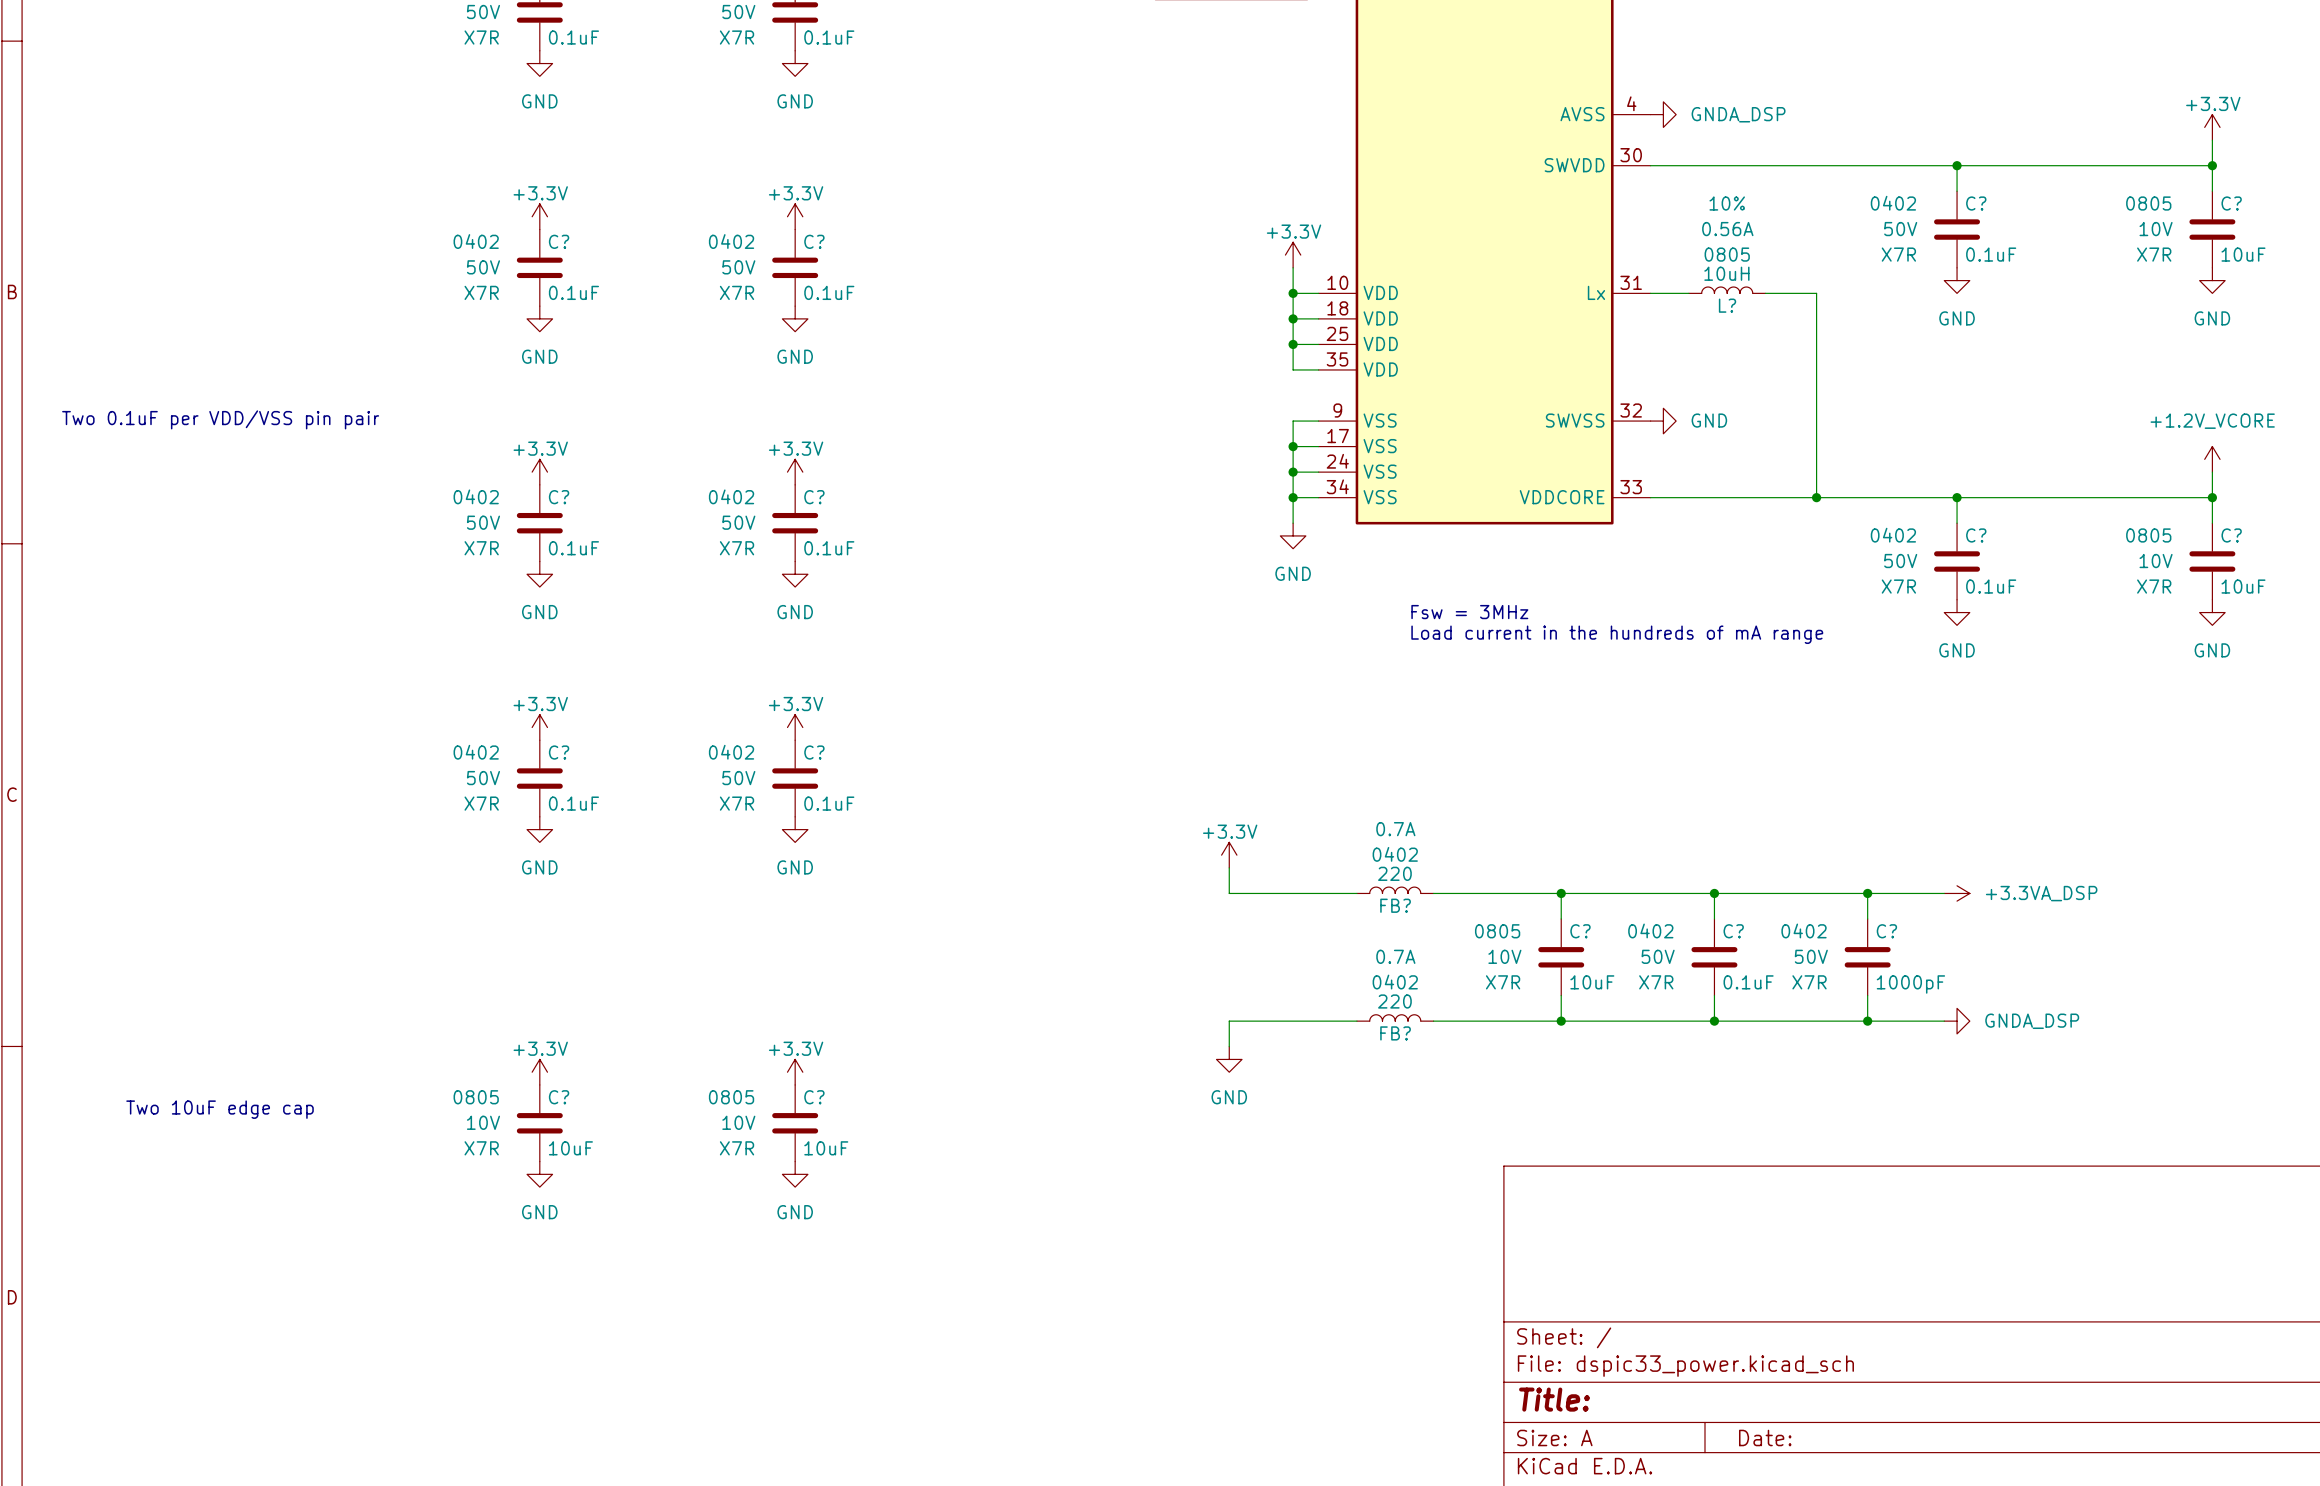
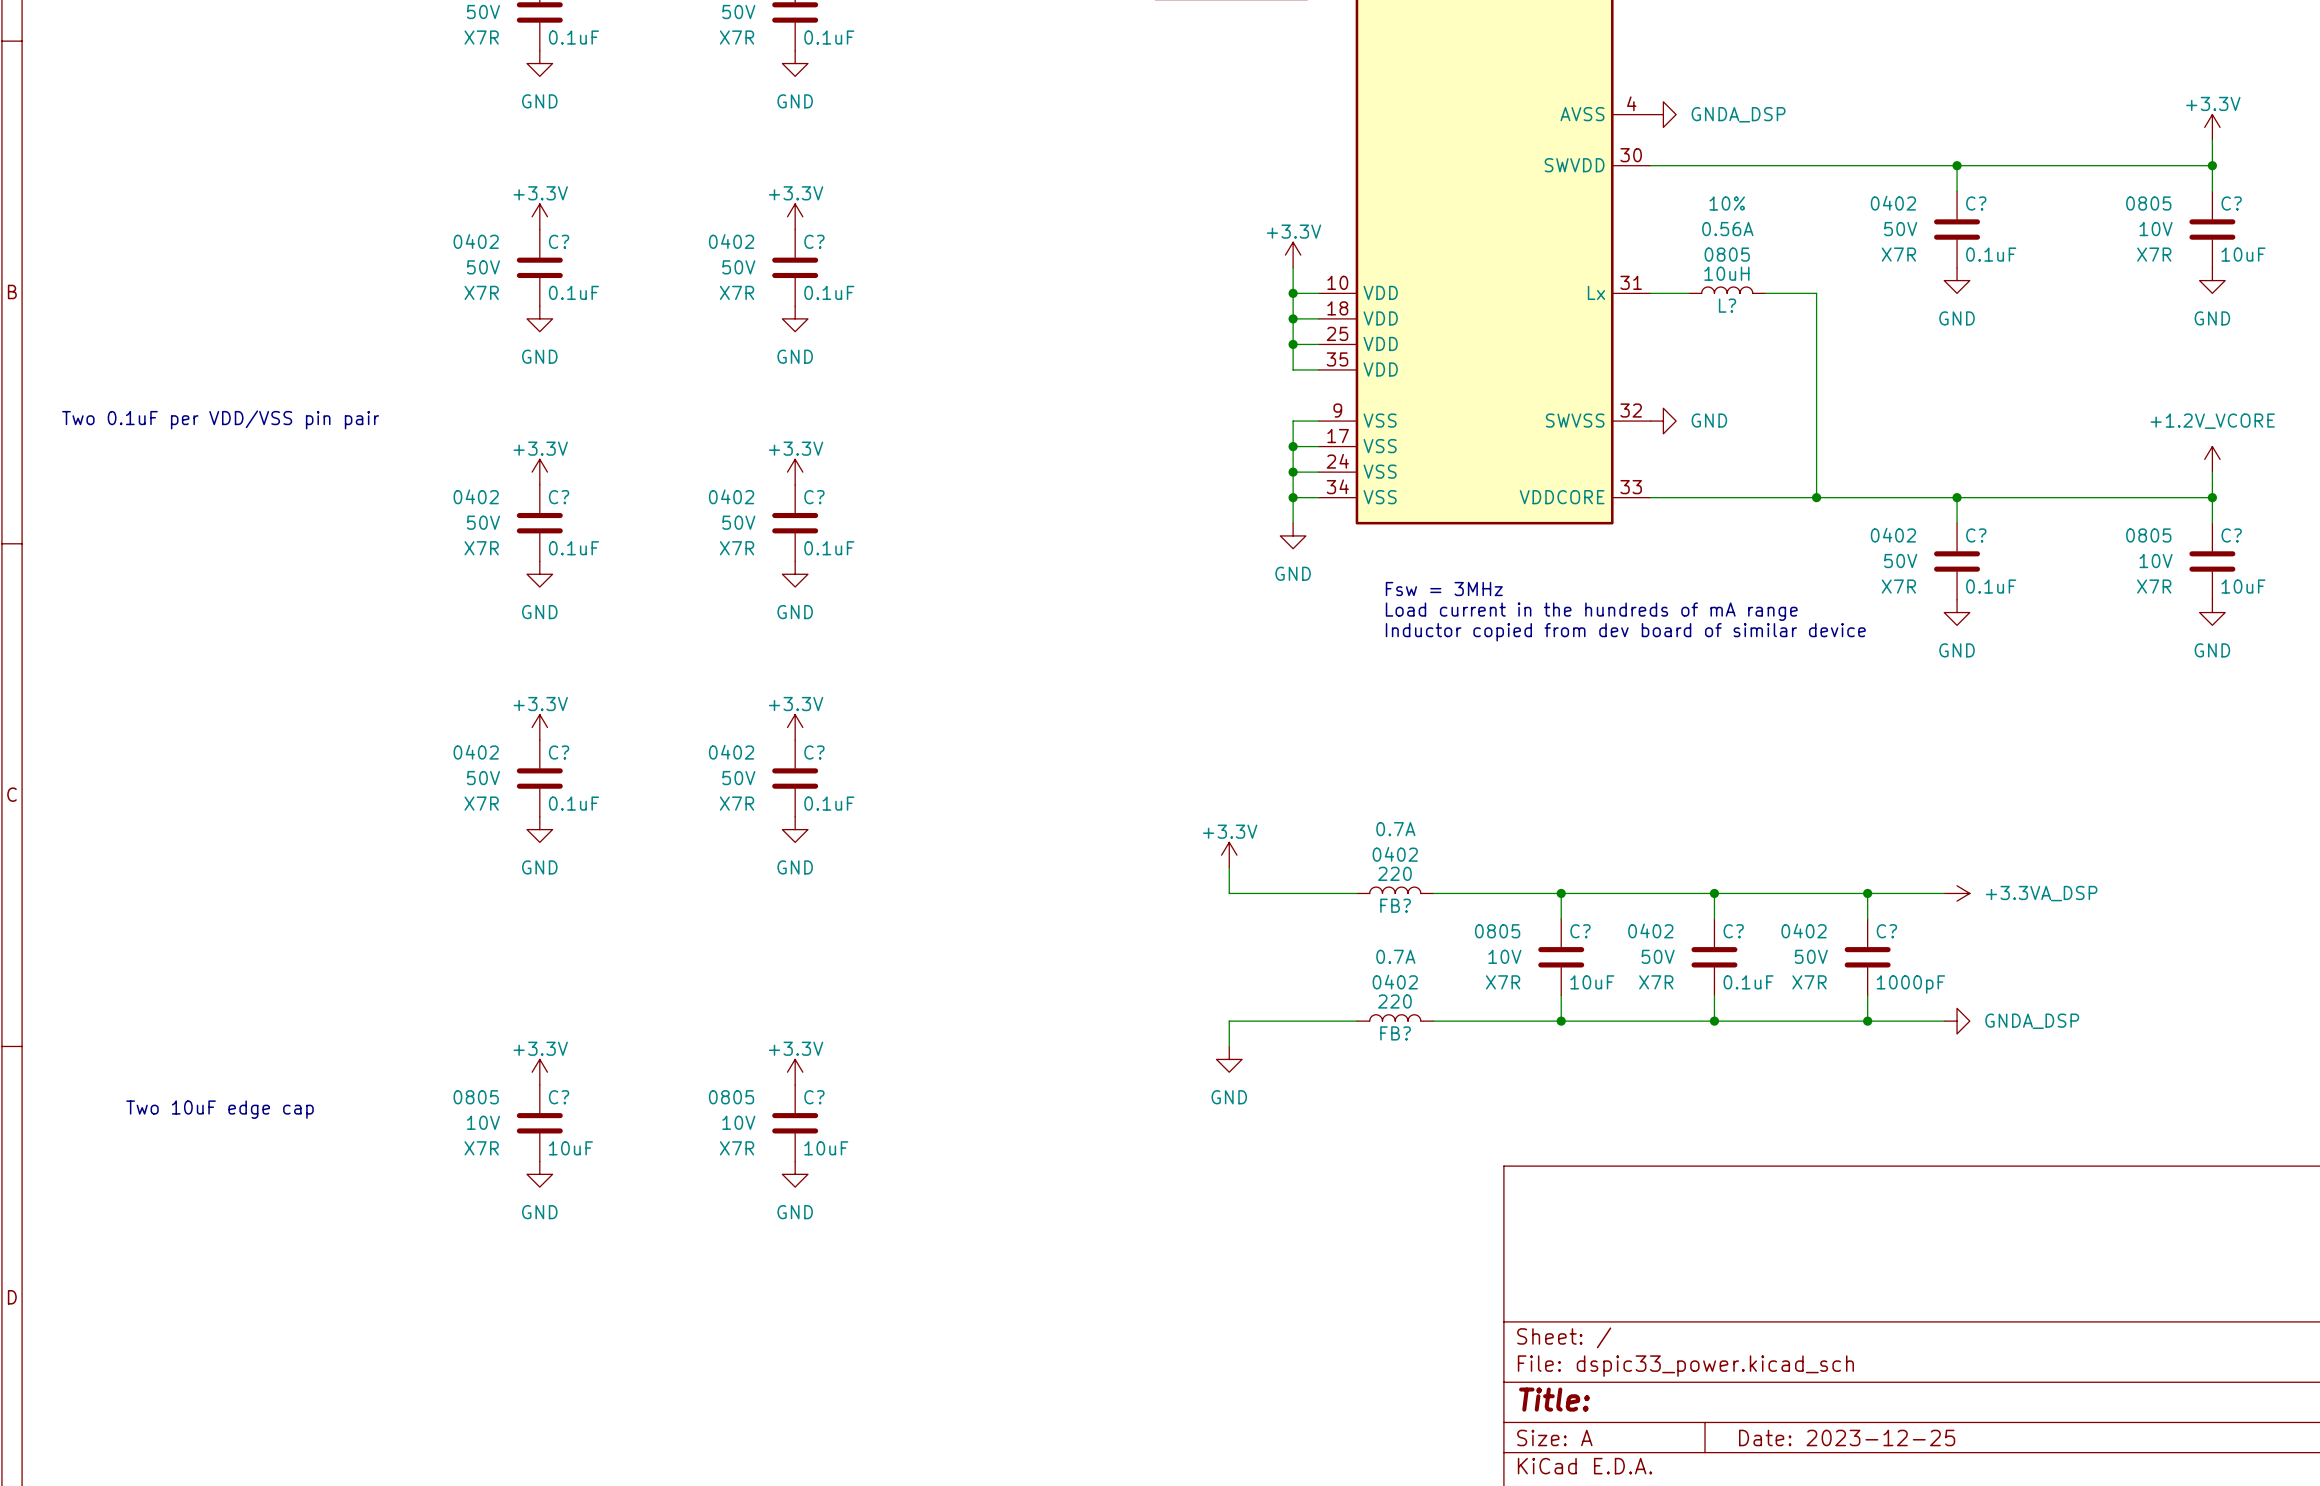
text position: Fsw = 3MHz (1469, 612) -> Fsw = 3MHz (1444, 589)
text: none -> Inductor copied from dev board of similar device (1625, 632)
text position: Load current in the hundreds of mA range (1617, 634) -> Load current in the hundreds of mA range (1591, 611)
title block: Date: (1765, 1437) -> Date: 2023-12-25 (1847, 1437)

